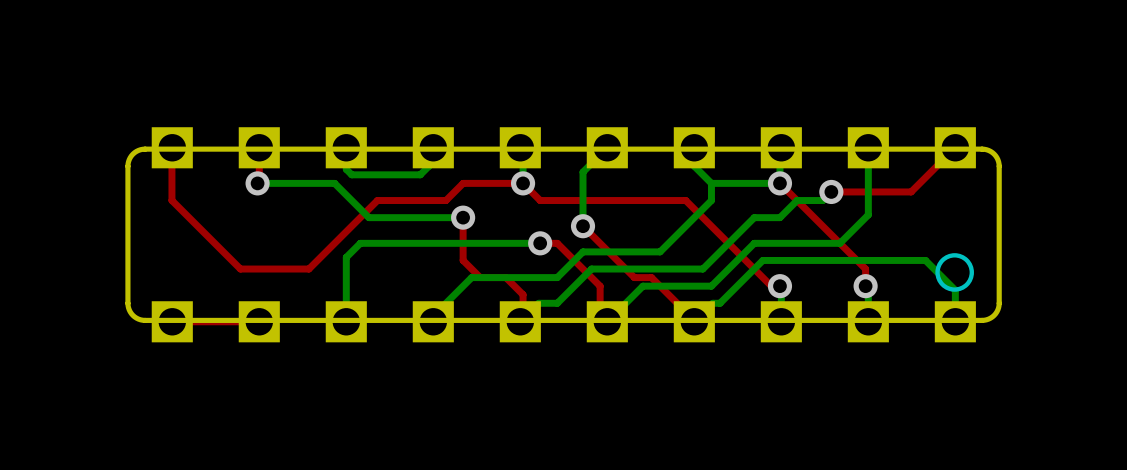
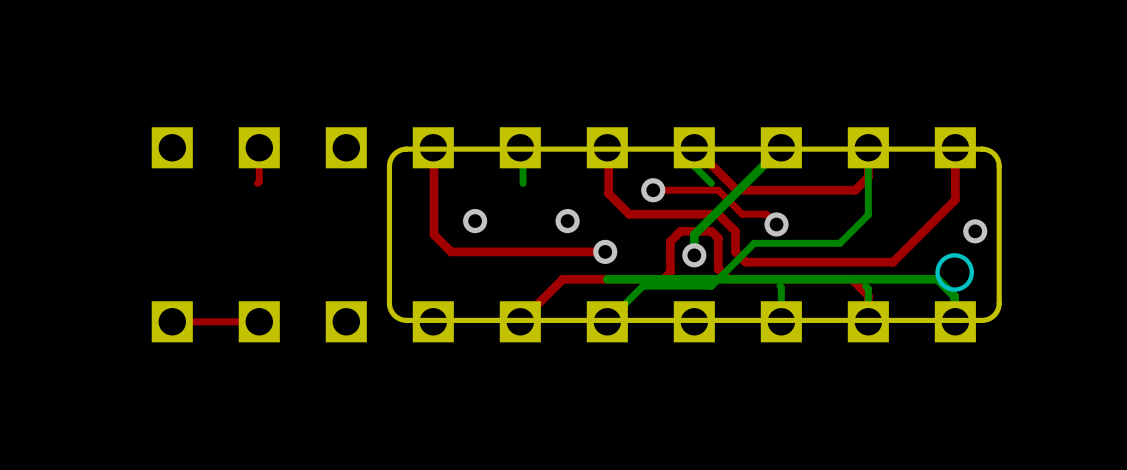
bottom track: (433, 147) (428, 152) (428, 166) (420, 174) (351, 174) (346, 169) (346, 147) -> none
top track: none -> (433, 147) (434, 234) (451, 251) (605, 251)
bottom track: (607, 147) (583, 172) (583, 226) -> none
bottom track: none -> (781, 147) (694, 234) (694, 255)
top track: none -> (868, 147) (868, 177) (855, 190) (736, 190) (694, 147)
top track: (955, 147) (911, 191) (831, 191) -> (955, 147) (955, 199) (893, 262) (745, 262) (735, 251) (735, 231) (718, 214) (629, 214) (608, 193) (607, 147)
top track: (171, 148) (171, 200) (240, 269) (308, 269) (377, 200) (445, 200) (463, 183) (523, 183) (540, 200) (685, 200) (771, 286) (779, 286) -> none
board edge: (406, 149) (145, 149) (132, 154) (127, 166) (127, 303) (130, 311) (136, 318) (145, 320) (406, 320) -> (406, 149) (394, 154) (389, 166) (389, 305) (394, 315) (406, 320)
bottom track: (779, 149) (779, 183) (711, 183) (711, 200) (660, 251) (583, 251) (557, 277) (471, 277) (433, 315) (433, 321) -> none
bottom track: (257, 183) (334, 183) (368, 217) (463, 217) -> none
via: (257, 183) -> none
via: (523, 183) -> none
top track: (779, 183) (865, 269) (865, 286) -> none
via: (779, 183) -> none
top track: none -> (653, 190) (718, 190) (742, 214) (766, 214) (776, 224)
via: none -> (653, 190)
bottom track: (831, 191) (822, 200) (797, 200) (779, 217) (754, 217) (702, 269) (591, 269) (557, 303) (538, 303) (520, 321) -> none
via: (831, 191) -> none
top track: (463, 217) (463, 260) (480, 277) (505, 277) (523, 294) (523, 319) -> (868, 321) (868, 295) (851, 279) (728, 279) (718, 269) (718, 238) (711, 231) (680, 231) (670, 241) (670, 272) (663, 279) (562, 279) (523, 319)
via position: (463, 217) -> (475, 221)
via: none -> (776, 224)
top track: (583, 226) (634, 277) (651, 277) (694, 320) -> none
via position: (583, 226) -> (567, 221)
via: none -> (975, 231)
bottom track: (540, 243) (360, 243) (346, 257) (346, 321) -> none
top track: (540, 243) (557, 243) (600, 286) (600, 314) (607, 321) -> none
via: (540, 243) -> none
via: none -> (605, 251)
via: none -> (694, 255)
via: (779, 286) -> none
via: (865, 286) -> none
bottom track: (955, 321) (955, 290) (925, 260) (762, 260) (720, 303) (712, 303) (694, 321) -> (955, 321) (954, 296) (937, 279) (607, 279)

